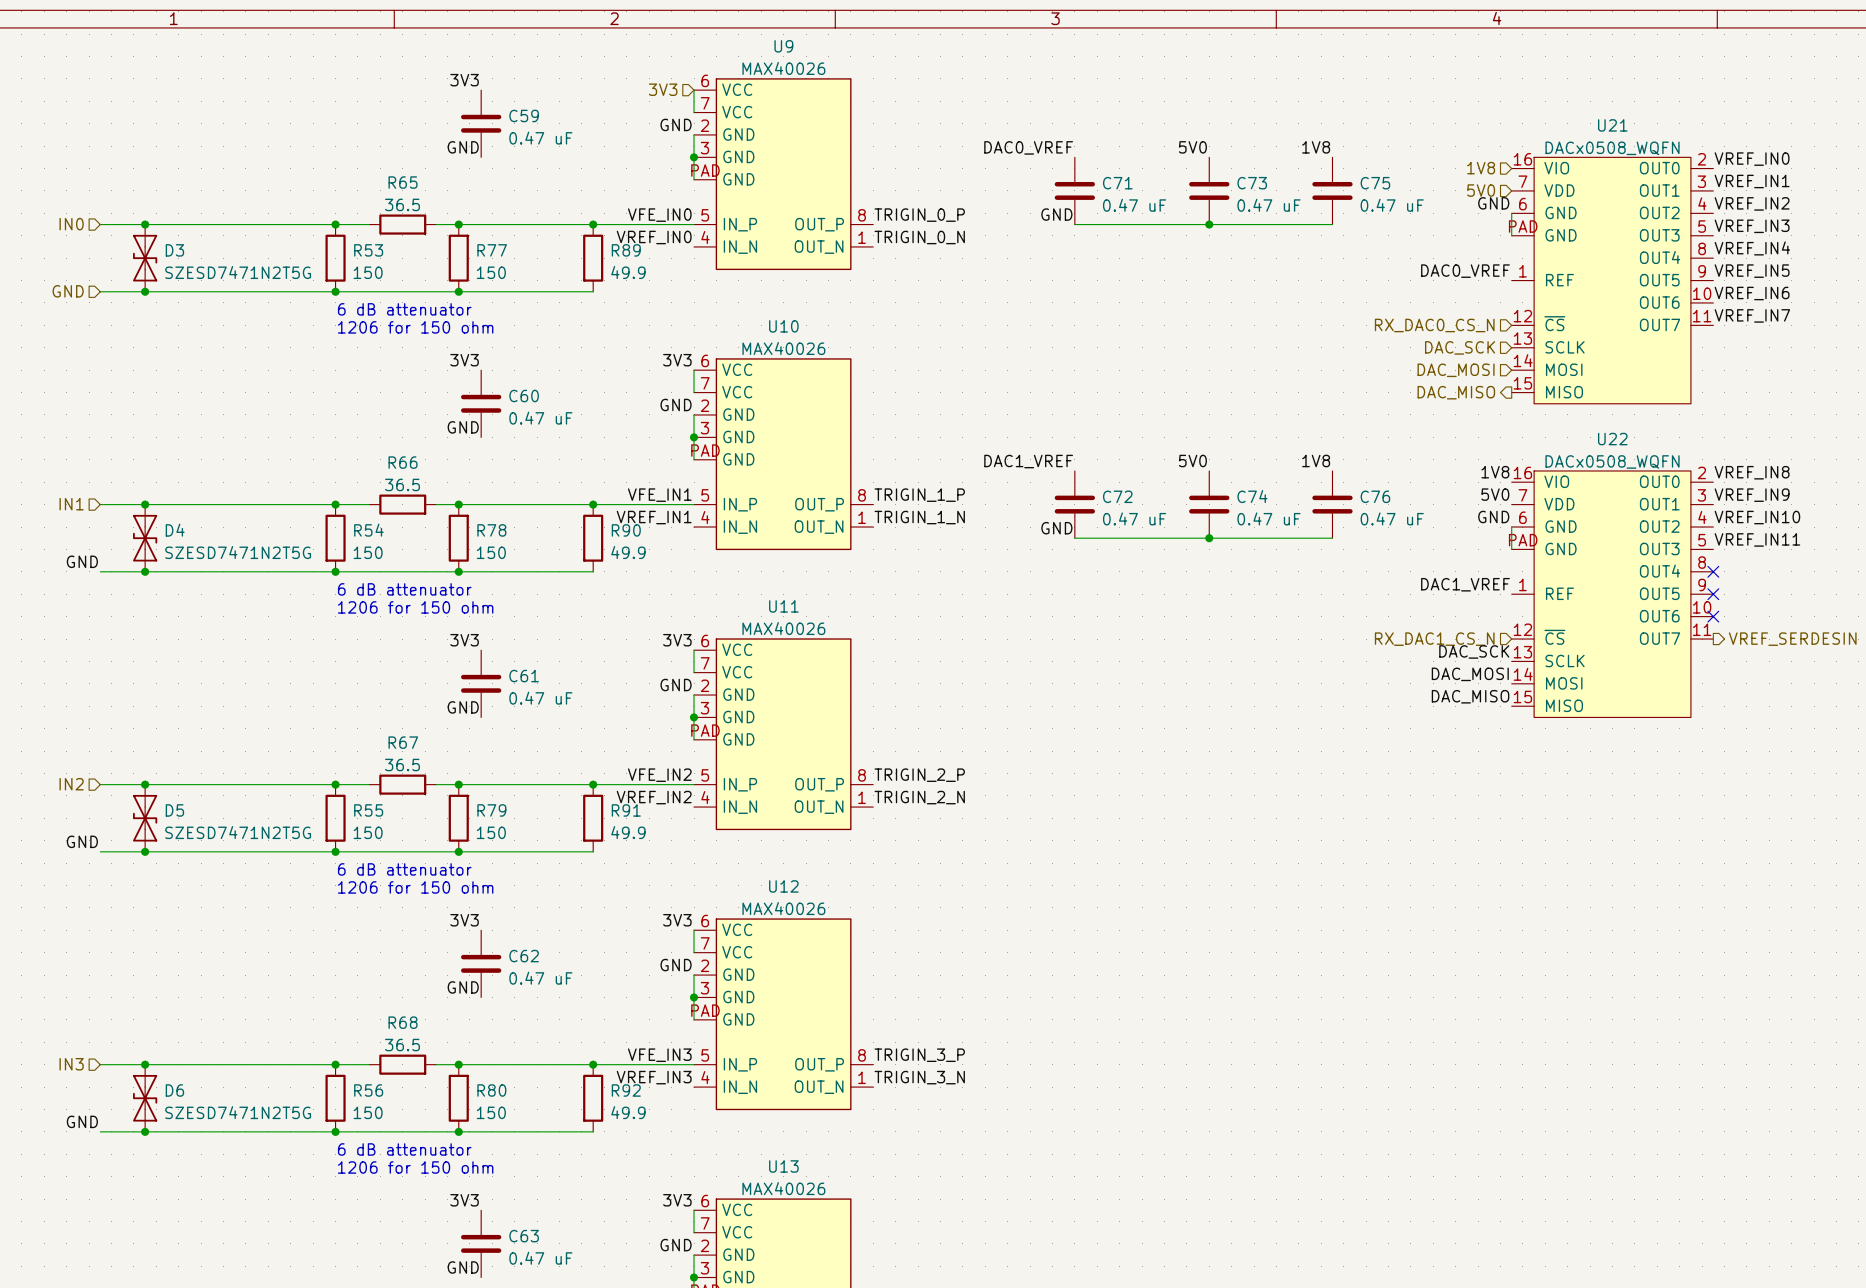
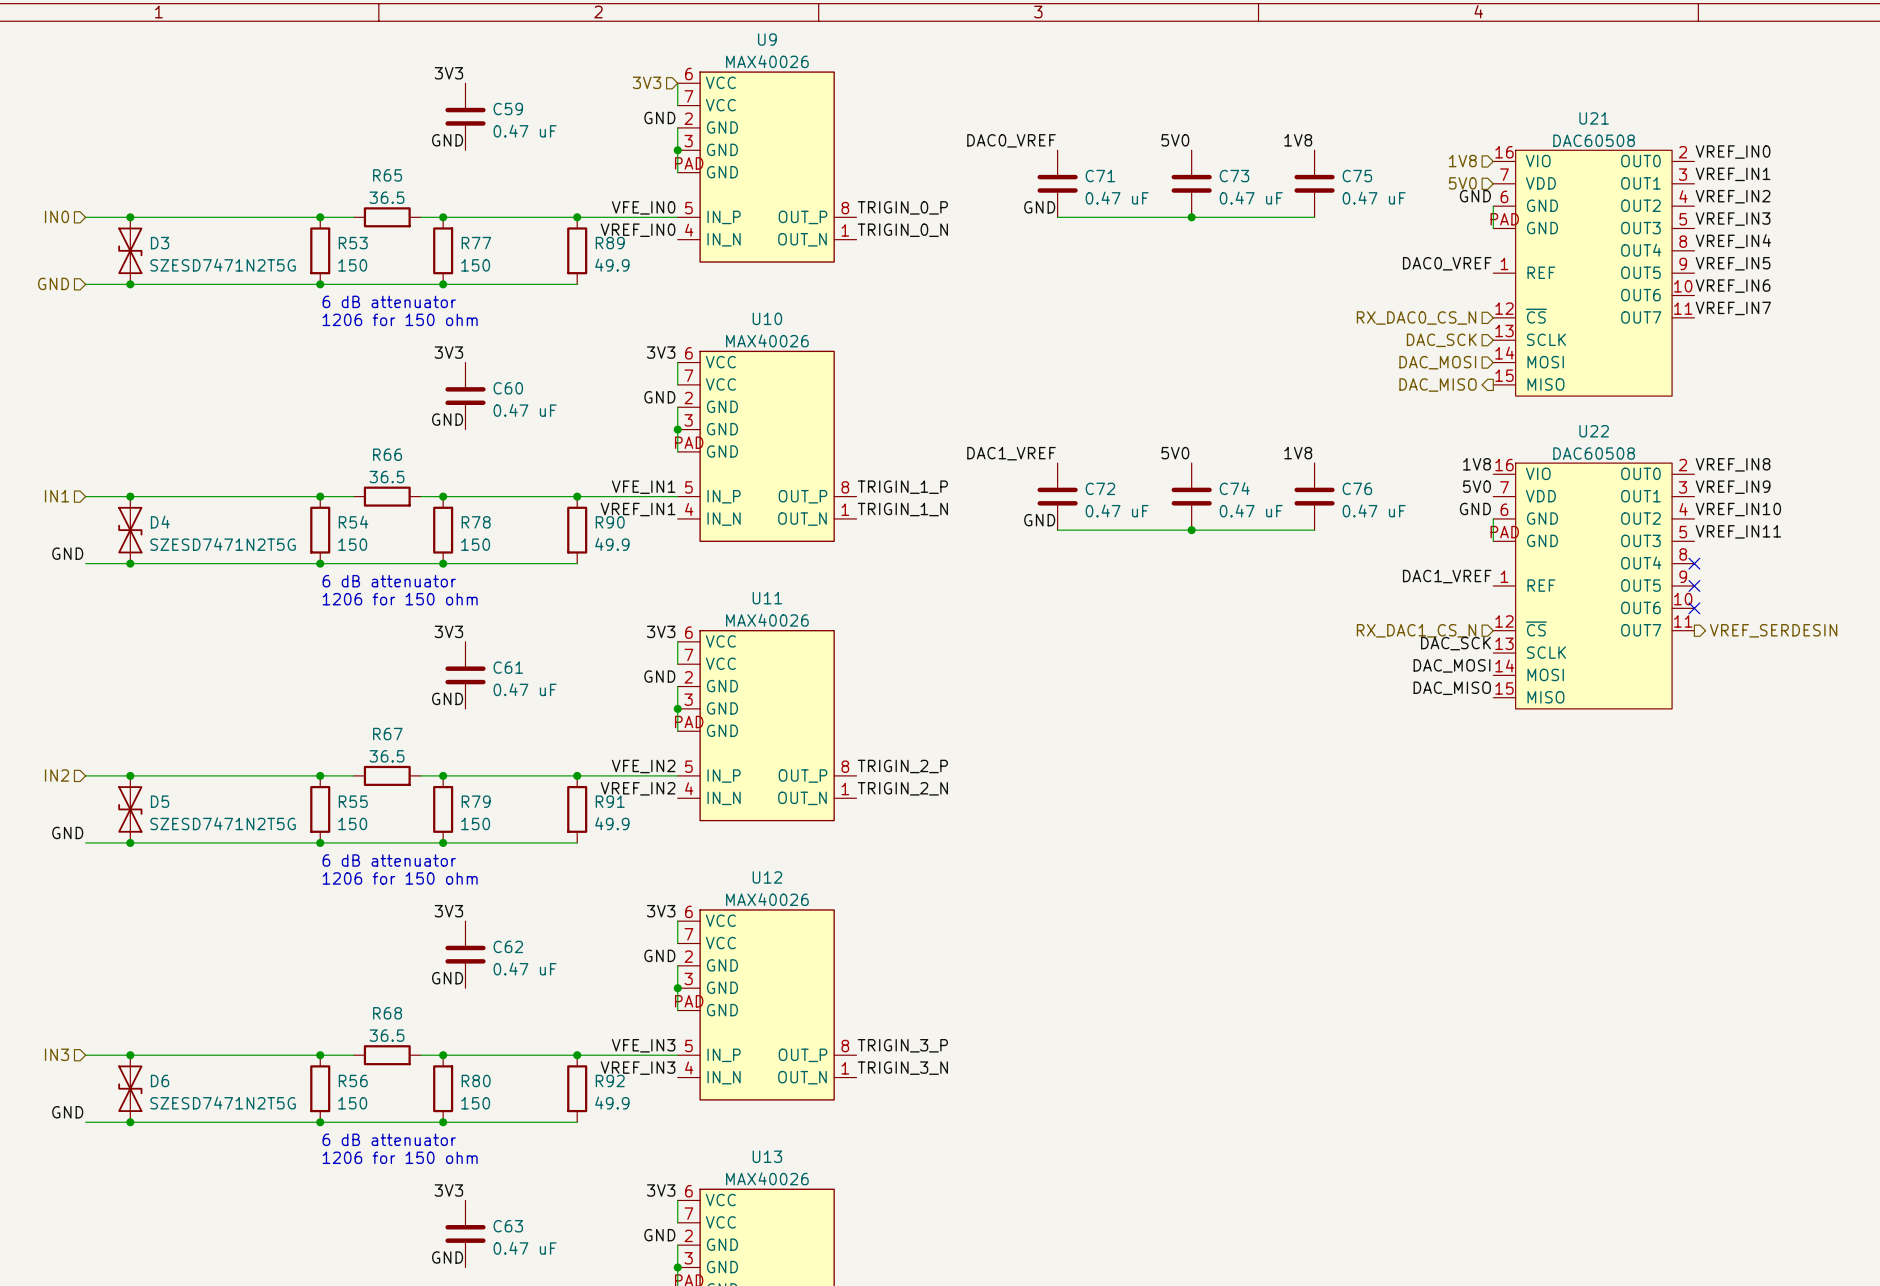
U21 value: DACx0508_WQFN (1612, 148) -> DAC60508 (1594, 140)
U22 value: DACx0508_WQFN (1612, 461) -> DAC60508 (1594, 453)

